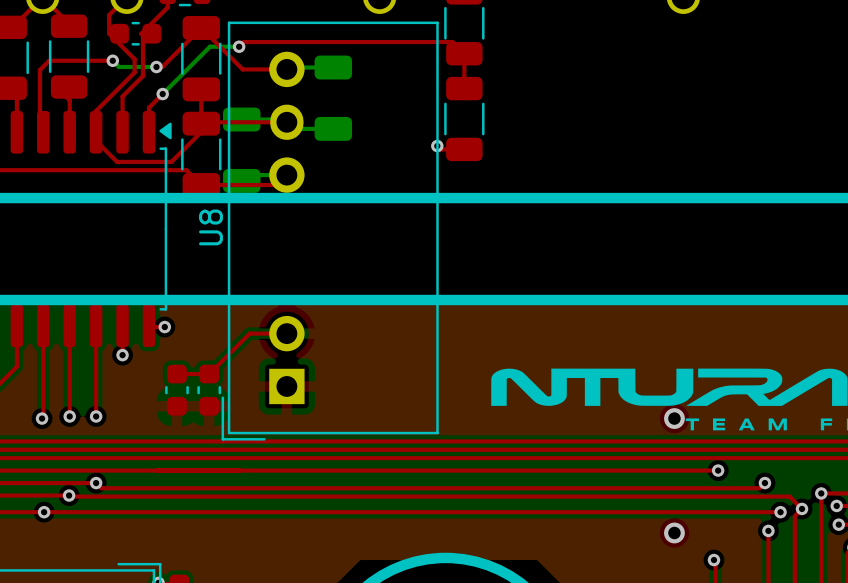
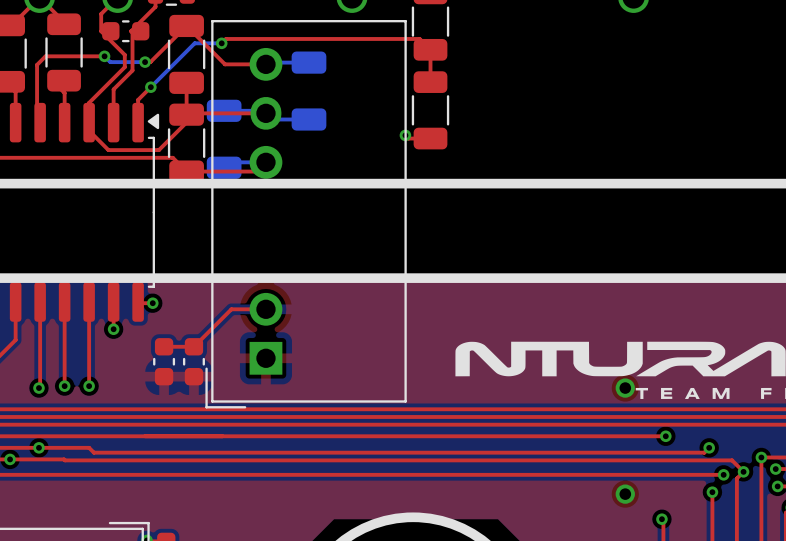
U8 name: U8 (211, 227) -> none
via: none -> (38, 447)
via: (96, 483) -> none
via: none -> (10, 459)
via: (69, 495) -> none
via: (44, 512) -> none

